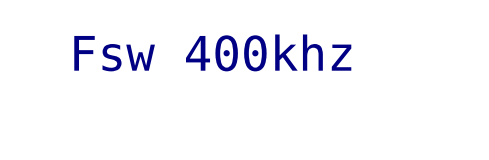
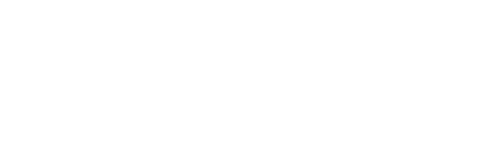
text: Fsw 400khz (212, 52) -> none

